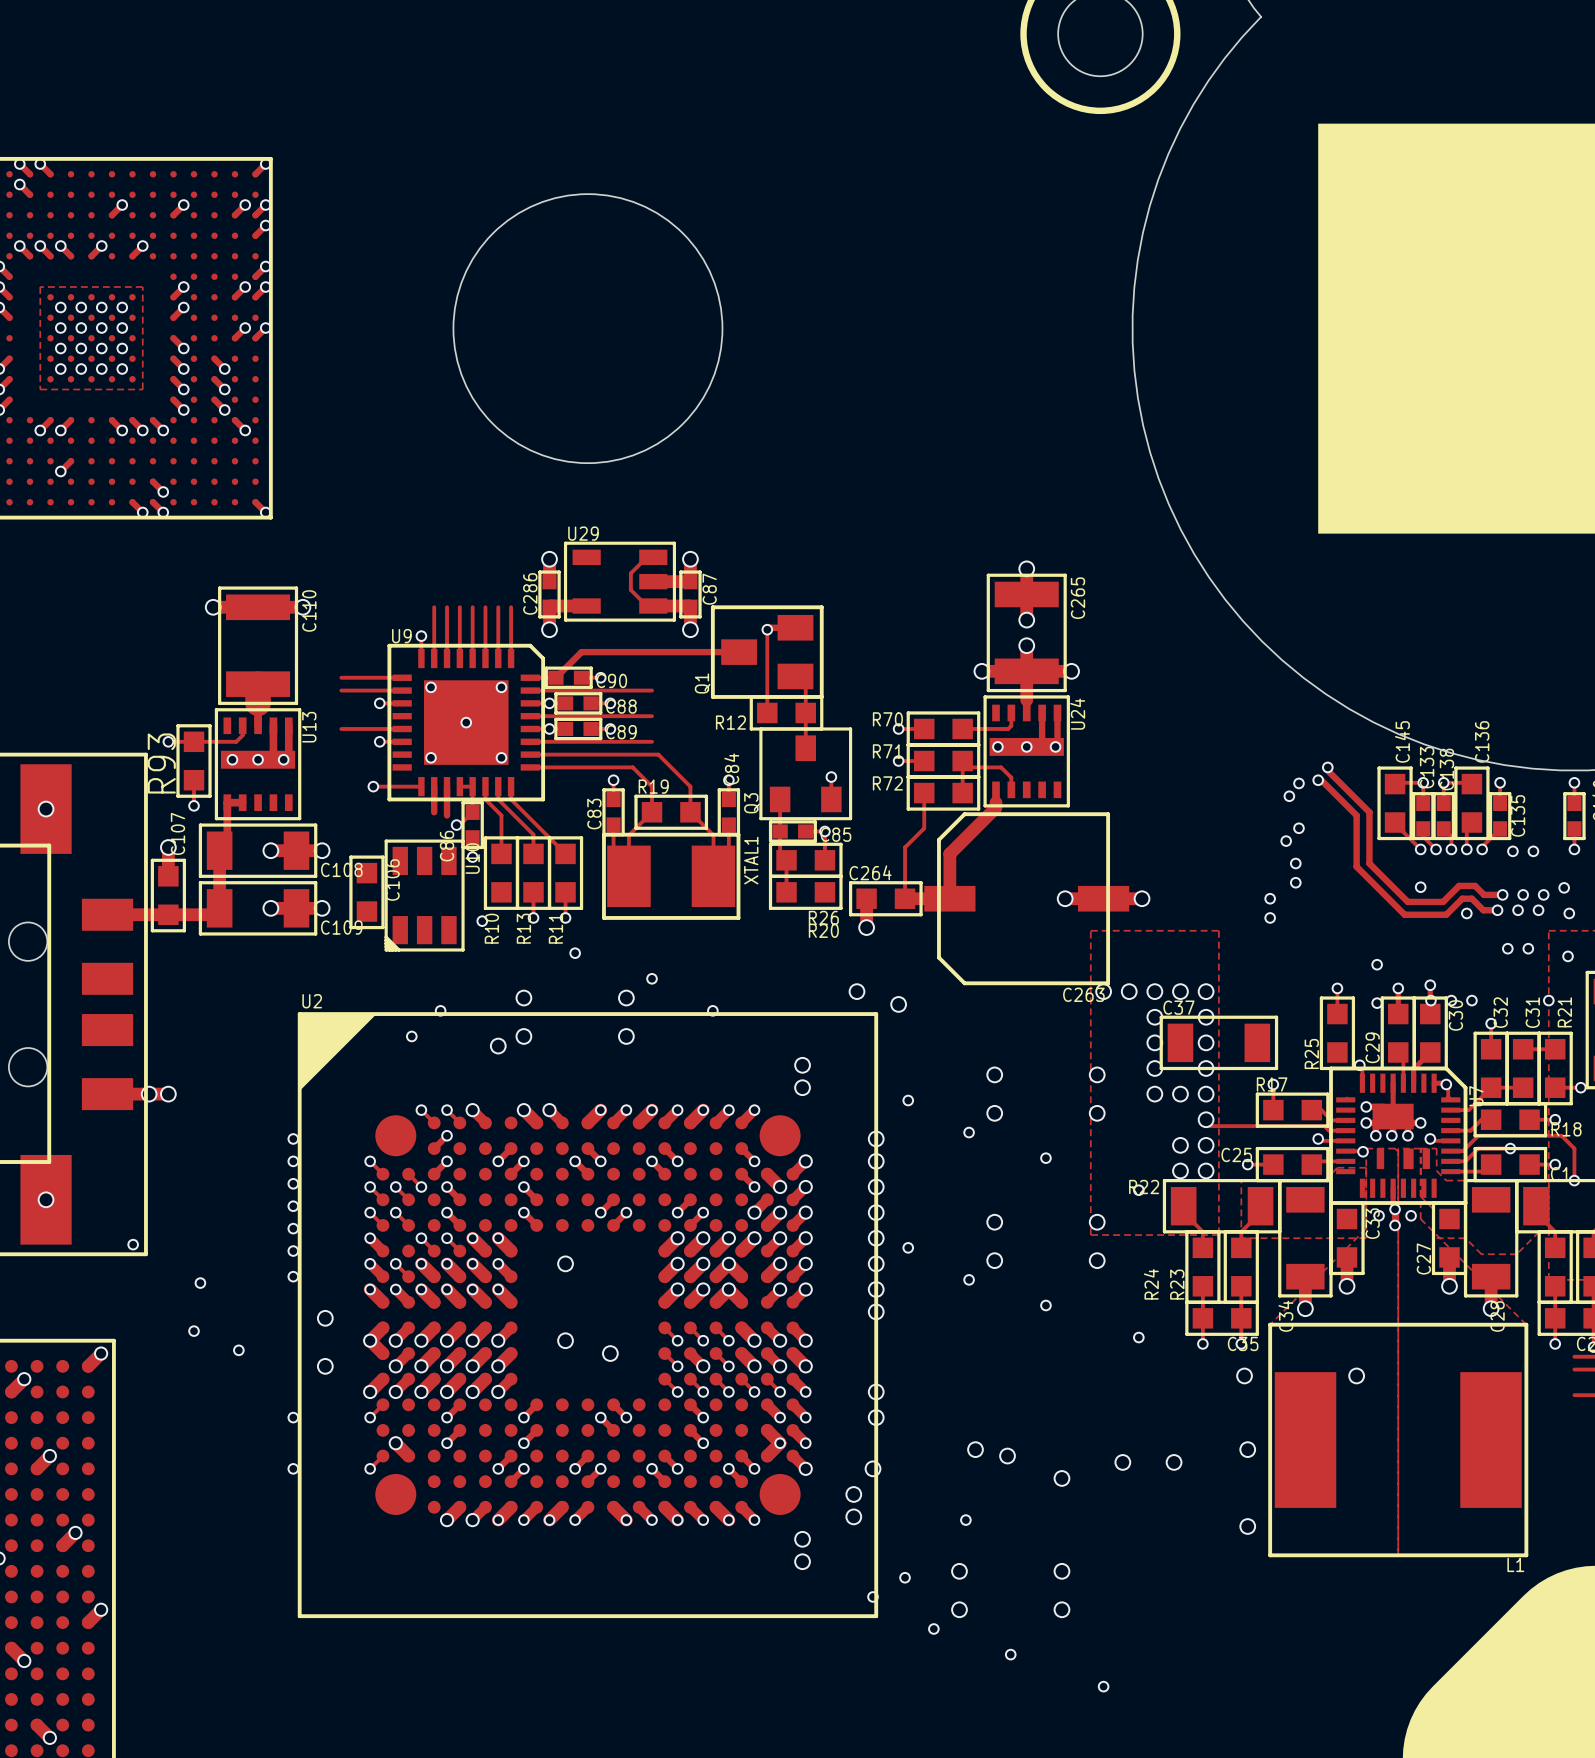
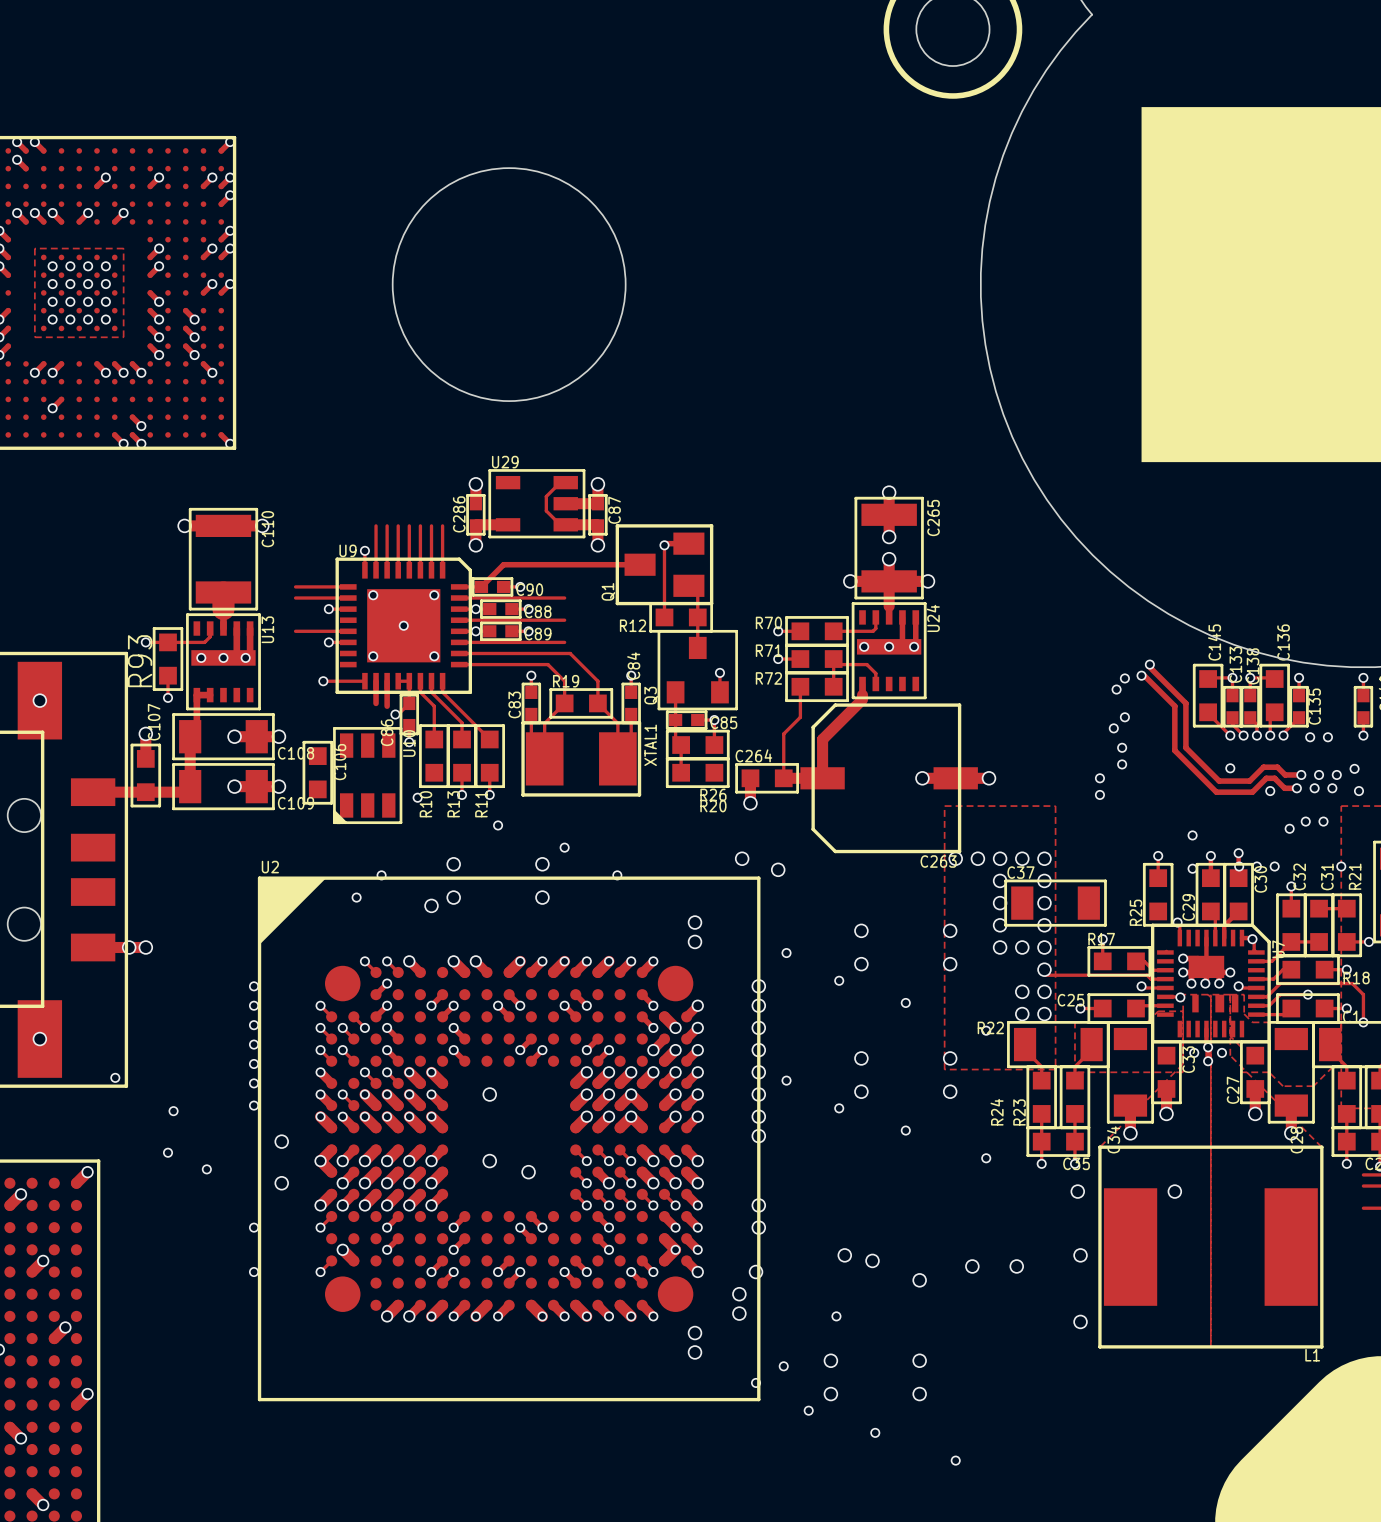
via position: (1568, 956) -> (1289, 828)

